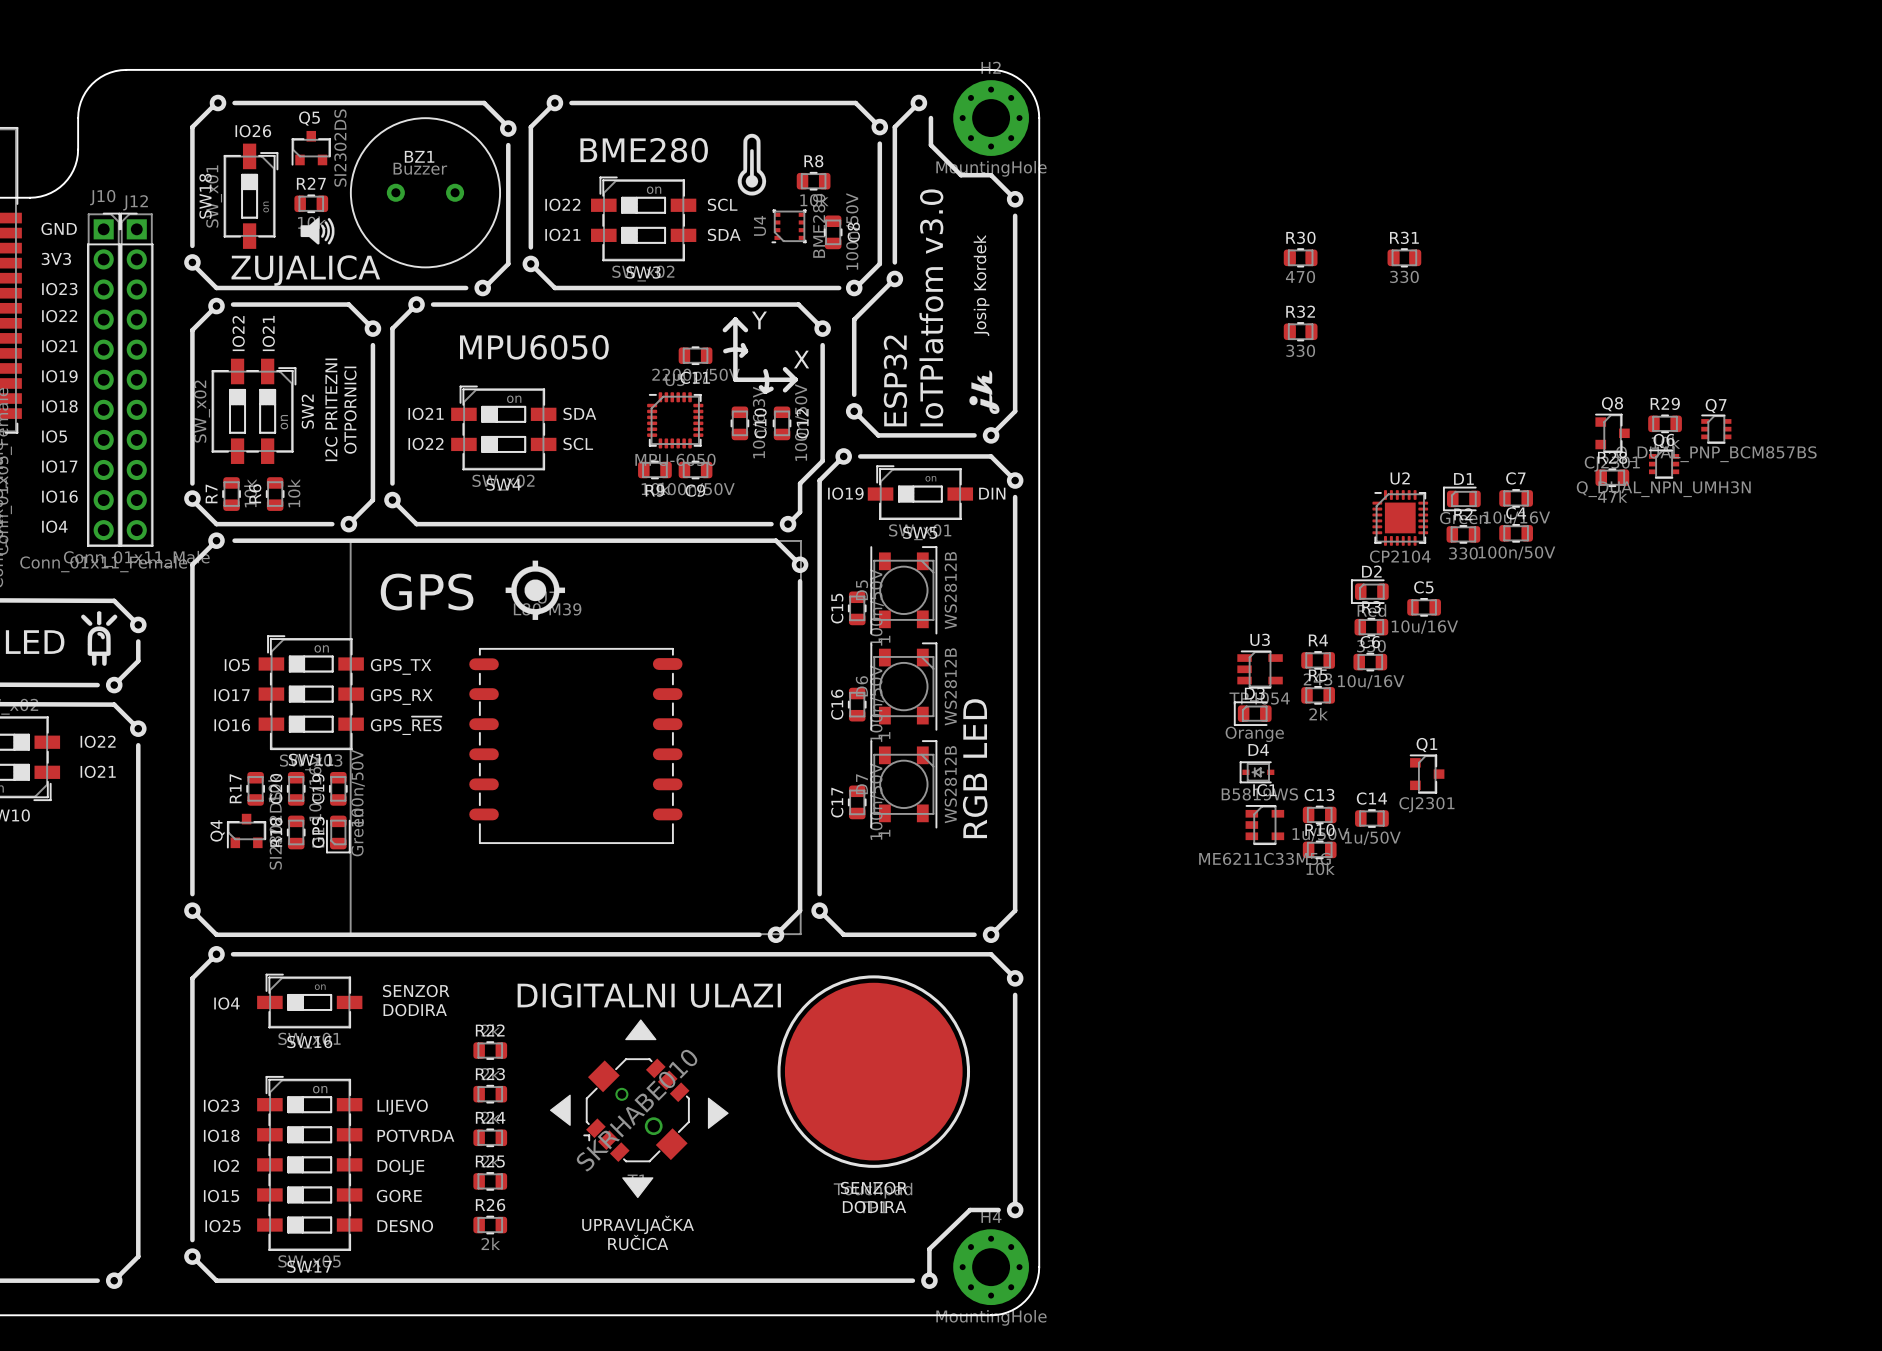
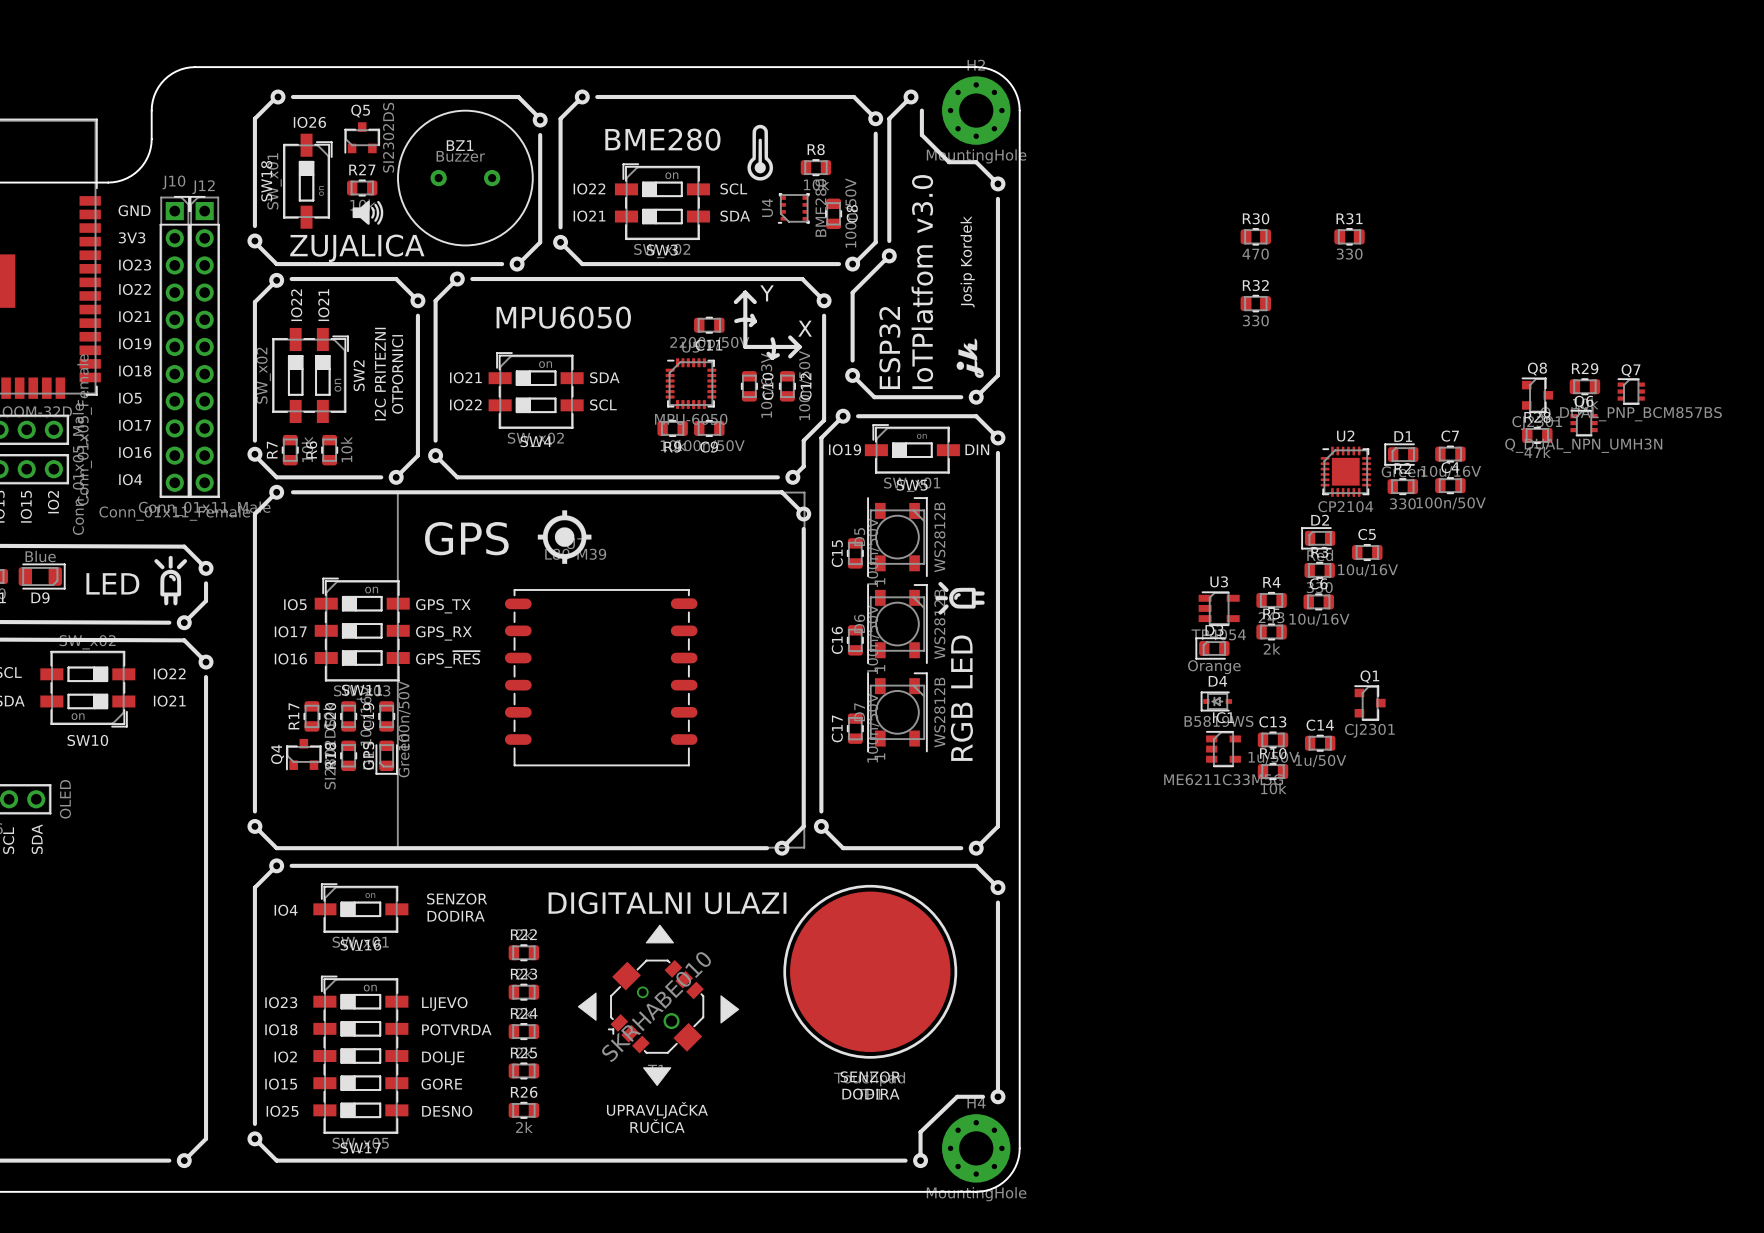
drawing: none -> [935, 581, 985, 615]

